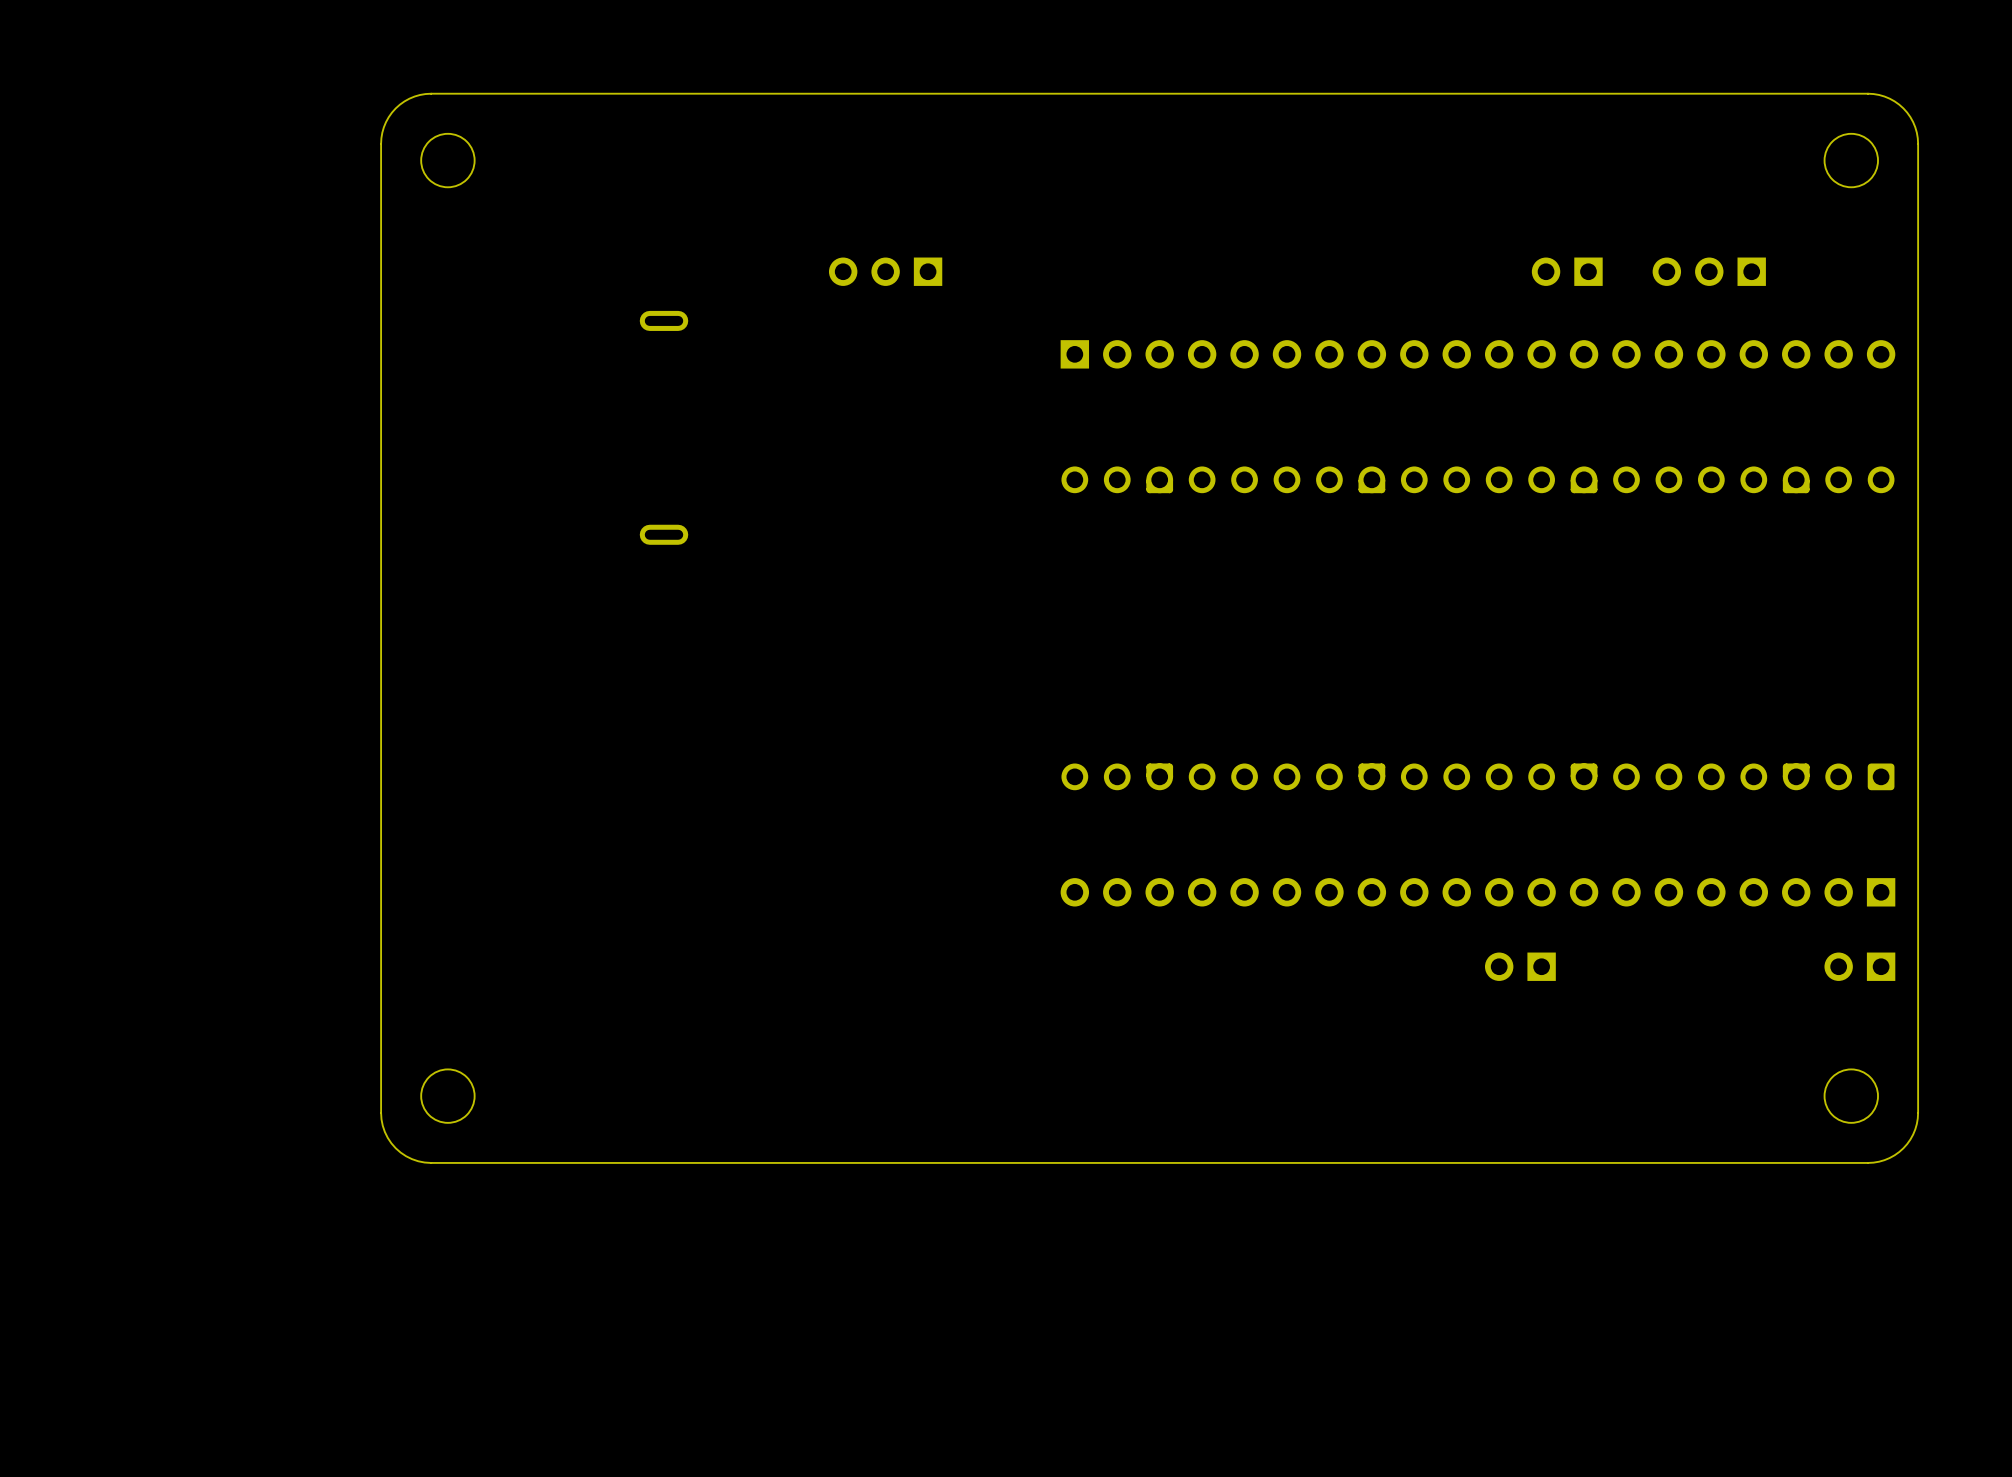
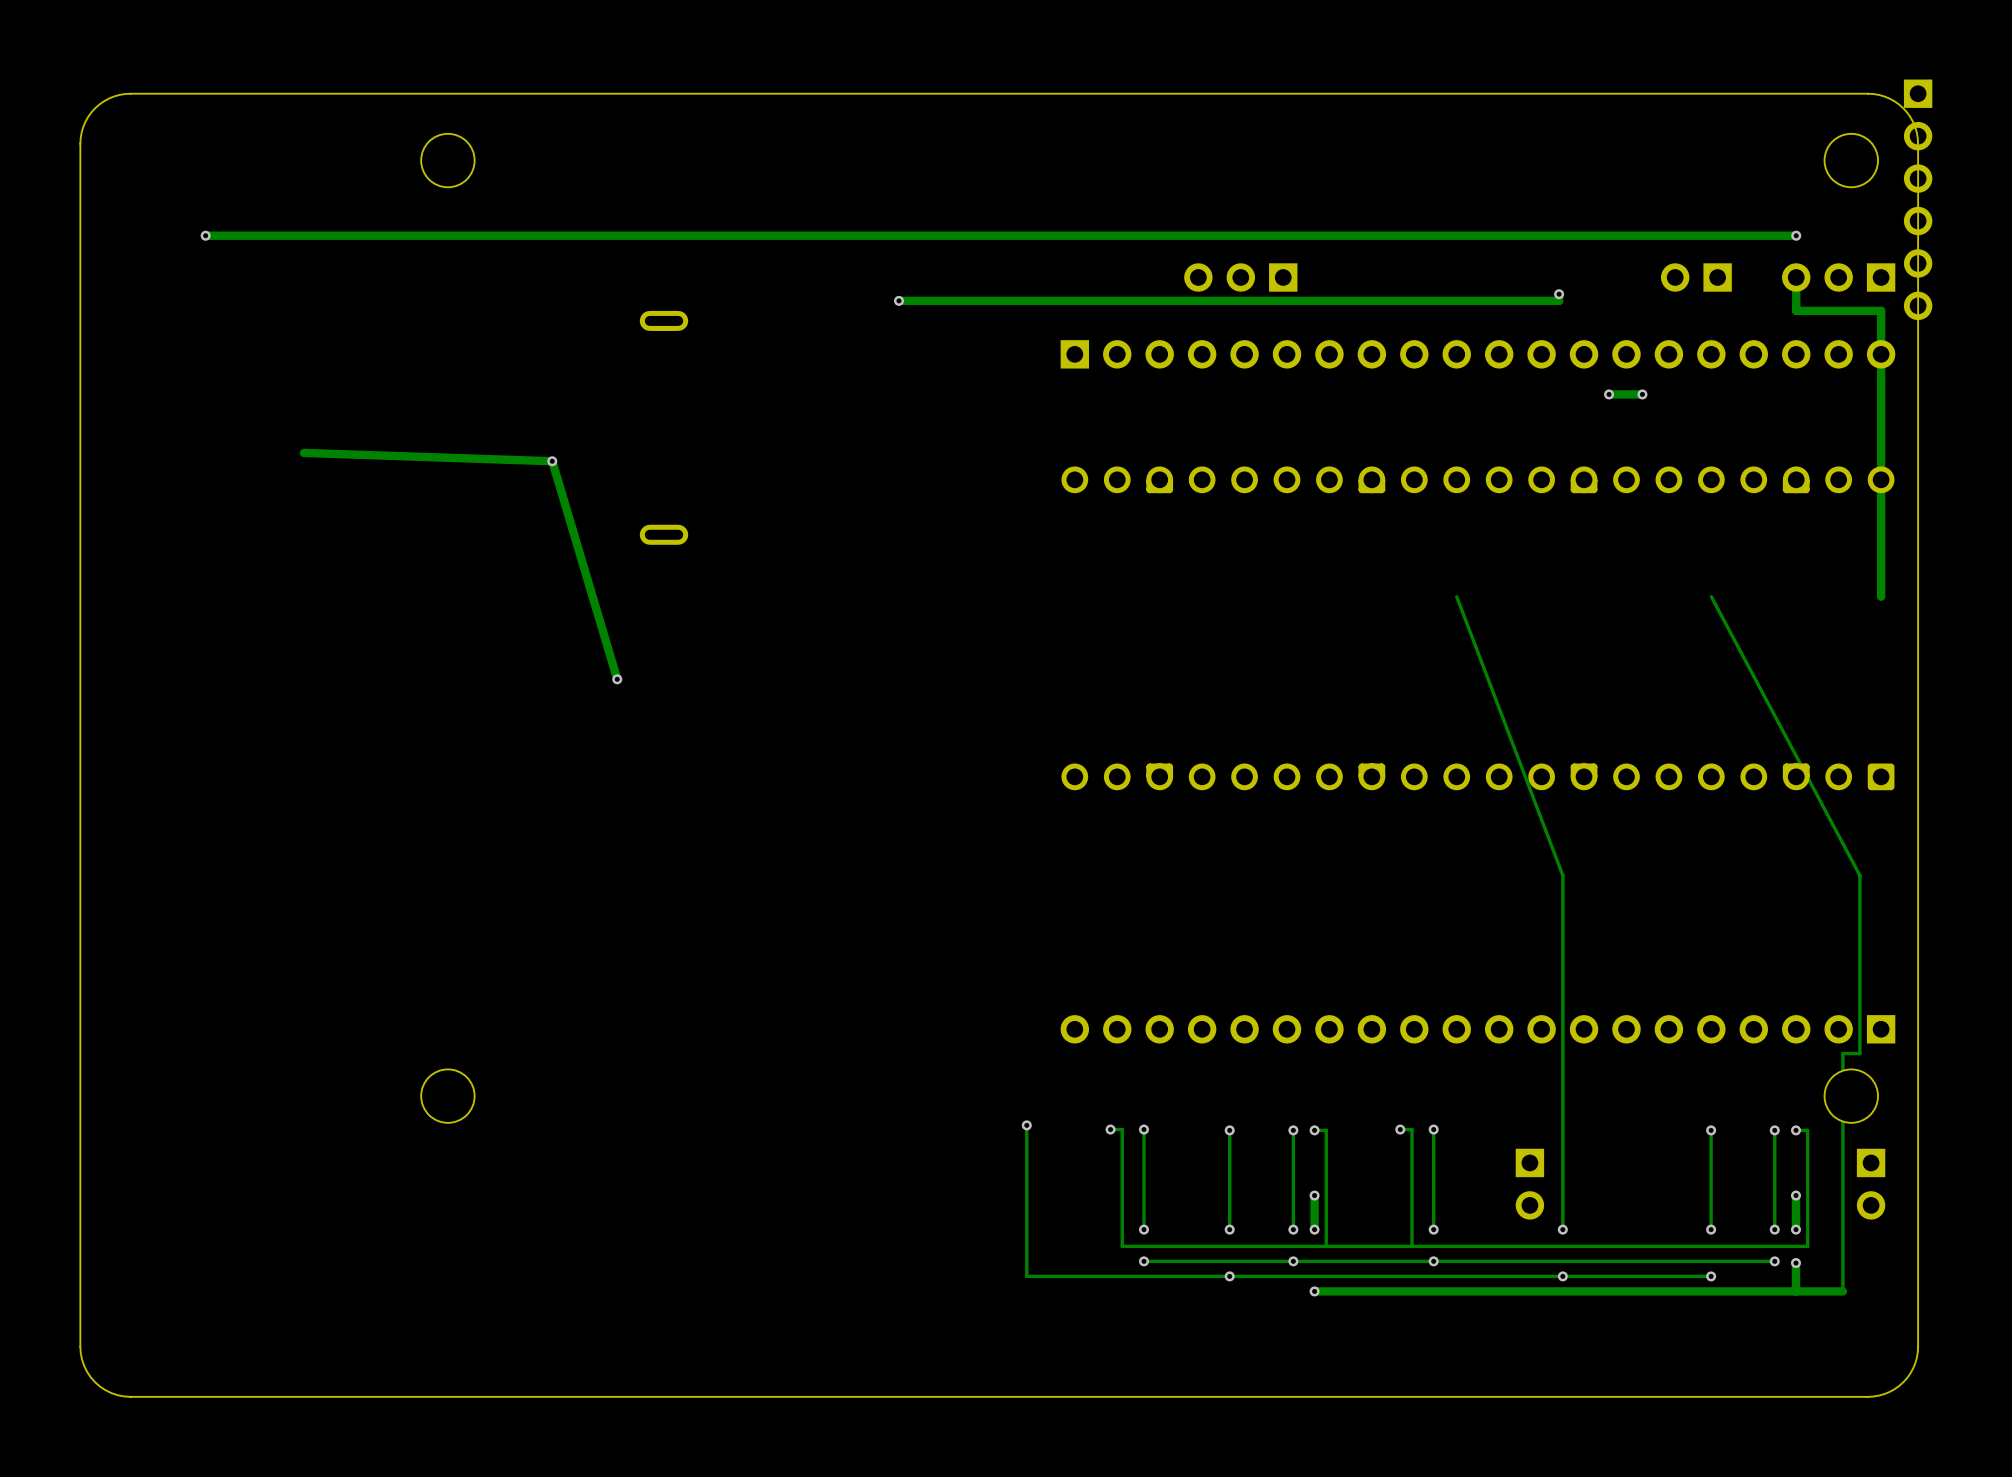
board edge: (431, 93) (409, 98) (395, 108) (386, 122) (381, 143) (381, 1112) (382, 1125) (387, 1137) (400, 1152) (418, 1161) (431, 1162) (1867, 1162) (1889, 1157) (1903, 1148) (1915, 1129) (1918, 1112) -> (431, 93) (124, 94) (113, 96) (99, 104) (88, 117) (81, 132) (80, 1346) (82, 1359) (87, 1371) (99, 1386) (117, 1395) (130, 1396) (1873, 1396) (1889, 1391) (1903, 1382) (1913, 1368) (1917, 1352) (1918, 1112)
part: none -> (1918, 199)
via: none -> (205, 235)
track: none -> (1796, 235) (205, 235)
via: none -> (1796, 235)
part footprint: [1652, 257, 1766, 286] -> [1660, 263, 1732, 292]
part position: (885, 271) -> (1240, 277)
part: (1567, 271) -> none
track: none -> (1796, 277) (1796, 310) (1881, 310) (1881, 596)
part: none -> (1838, 277)
track: none -> (1559, 294) (1559, 300) (898, 300)
via: none -> (1559, 294)
via: none -> (898, 300)
via: none -> (1609, 394)
track: none -> (1642, 394) (1609, 394)
via: none -> (1642, 394)
track: none -> (303, 452) (552, 461) (617, 679)
via: none -> (552, 461)
track: none -> (1456, 596) (1562, 875) (1562, 1229)
track: none -> (1711, 596) (1859, 875) (1859, 1053) (1842, 1053) (1842, 1291) (1314, 1291)
via: none -> (617, 679)
part position: (1477, 892) -> (1477, 1029)
part: (1520, 966) -> none
part: (1859, 966) -> none
track: none -> (1026, 1125) (1026, 1276) (1711, 1276)
via: none -> (1026, 1125)
track: none -> (1110, 1129) (1122, 1129) (1122, 1246) (1807, 1246) (1807, 1130) (1795, 1130)
via: none -> (1110, 1129)
track: none -> (1143, 1129) (1143, 1229)
via: none -> (1143, 1129)
track: none -> (1400, 1129) (1411, 1129) (1411, 1246)
via: none -> (1400, 1129)
track: none -> (1433, 1129) (1433, 1229)
via: none -> (1433, 1129)
track: none -> (1229, 1130) (1229, 1229)
via: none -> (1229, 1130)
track: none -> (1293, 1130) (1293, 1229)
via: none -> (1293, 1130)
track: none -> (1314, 1130) (1326, 1130) (1326, 1246)
via: none -> (1314, 1130)
track: none -> (1711, 1130) (1711, 1229)
via: none -> (1711, 1130)
track: none -> (1774, 1130) (1774, 1229)
via: none -> (1774, 1130)
via: none -> (1795, 1130)
part: none -> (1529, 1184)
part: none -> (1871, 1184)
track: none -> (1314, 1195) (1314, 1229)
via: none -> (1314, 1195)
track: none -> (1795, 1195) (1795, 1229)
via: none -> (1795, 1195)
via: none -> (1143, 1229)
via: none -> (1229, 1229)
via: none -> (1293, 1229)
via: none -> (1314, 1229)
via: none -> (1433, 1229)
via: none -> (1562, 1229)
via: none -> (1711, 1229)
via: none -> (1774, 1229)
via: none -> (1795, 1229)
via: none -> (1143, 1261)
via: none -> (1293, 1261)
via: none -> (1433, 1261)
track: none -> (1774, 1261) (1143, 1261)
via: none -> (1774, 1261)
track: none -> (1795, 1263) (1795, 1291)
via: none -> (1795, 1263)
via: none -> (1229, 1276)
via: none -> (1562, 1276)
via: none -> (1711, 1276)
via: none -> (1314, 1291)

